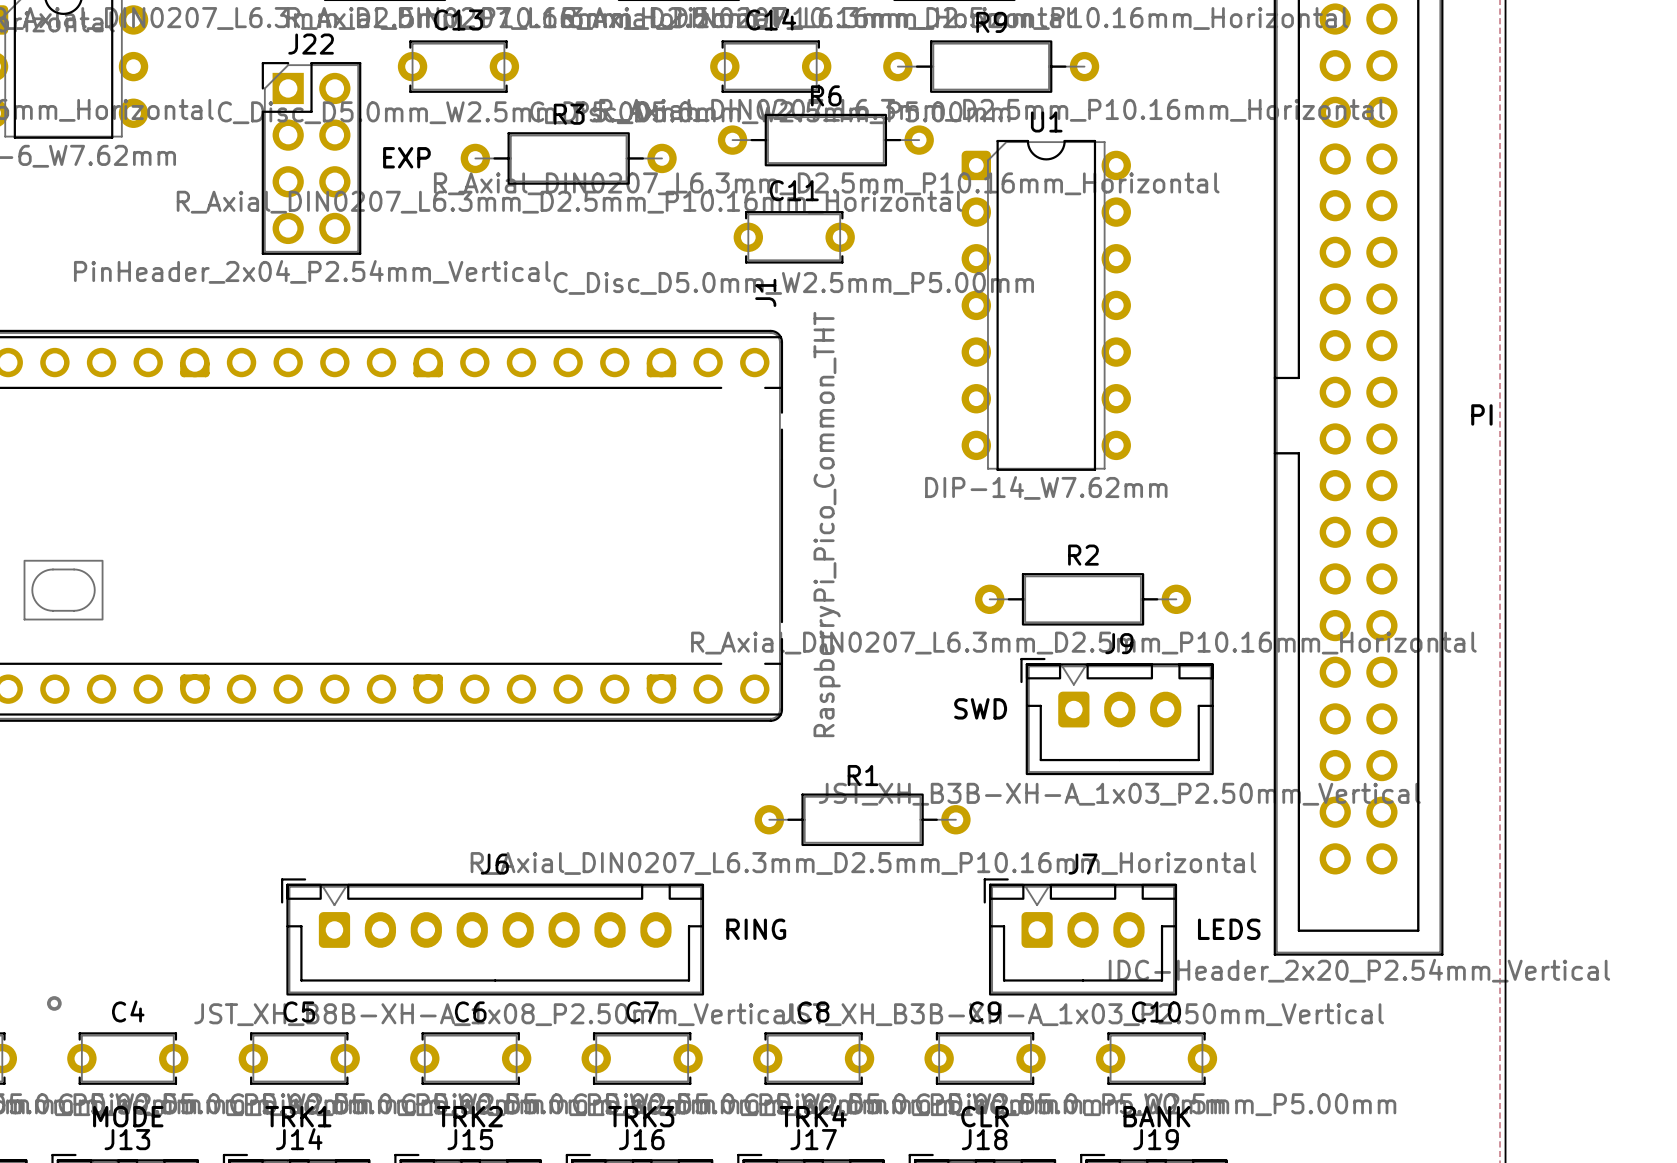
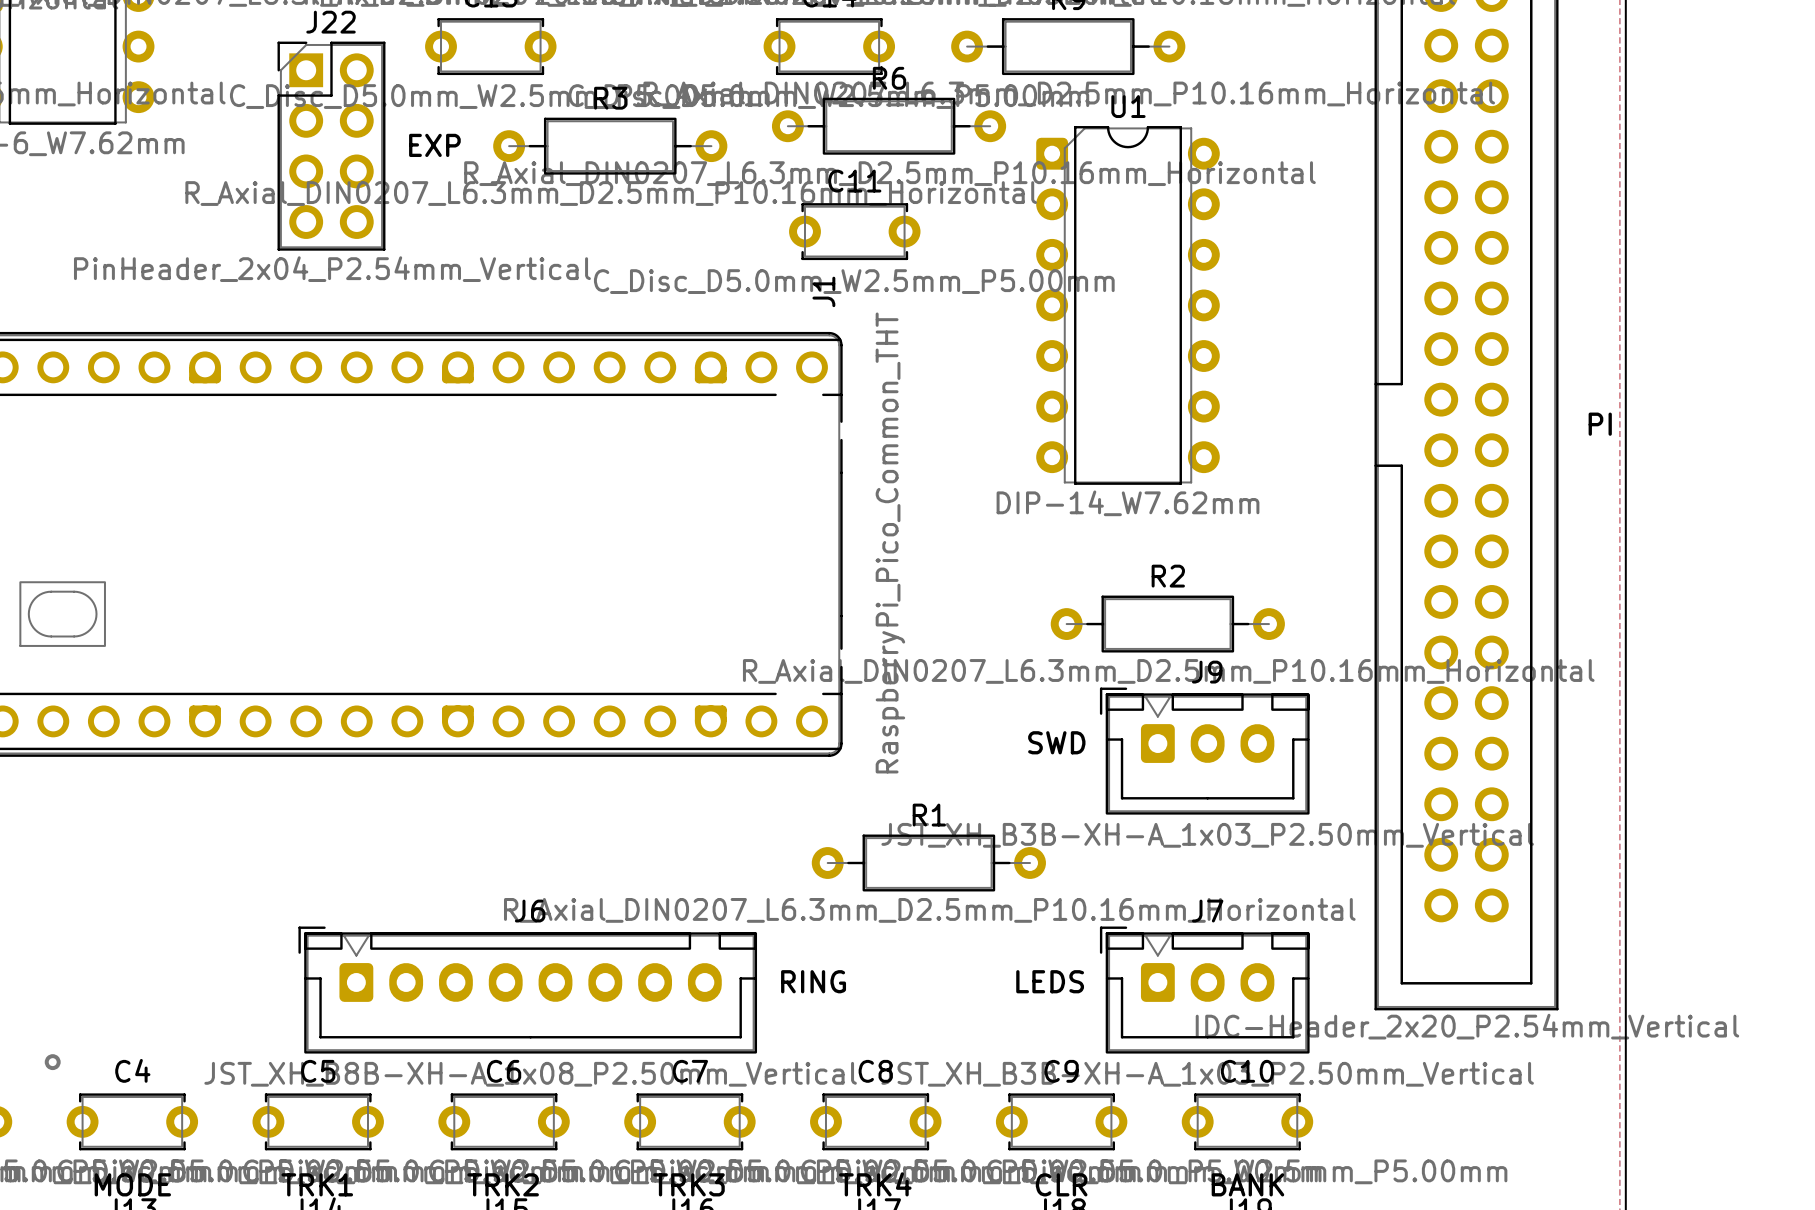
text position: LEDS (1229, 929) -> LEDS (1050, 981)
J7 position: (1080, 936) -> (1204, 990)

